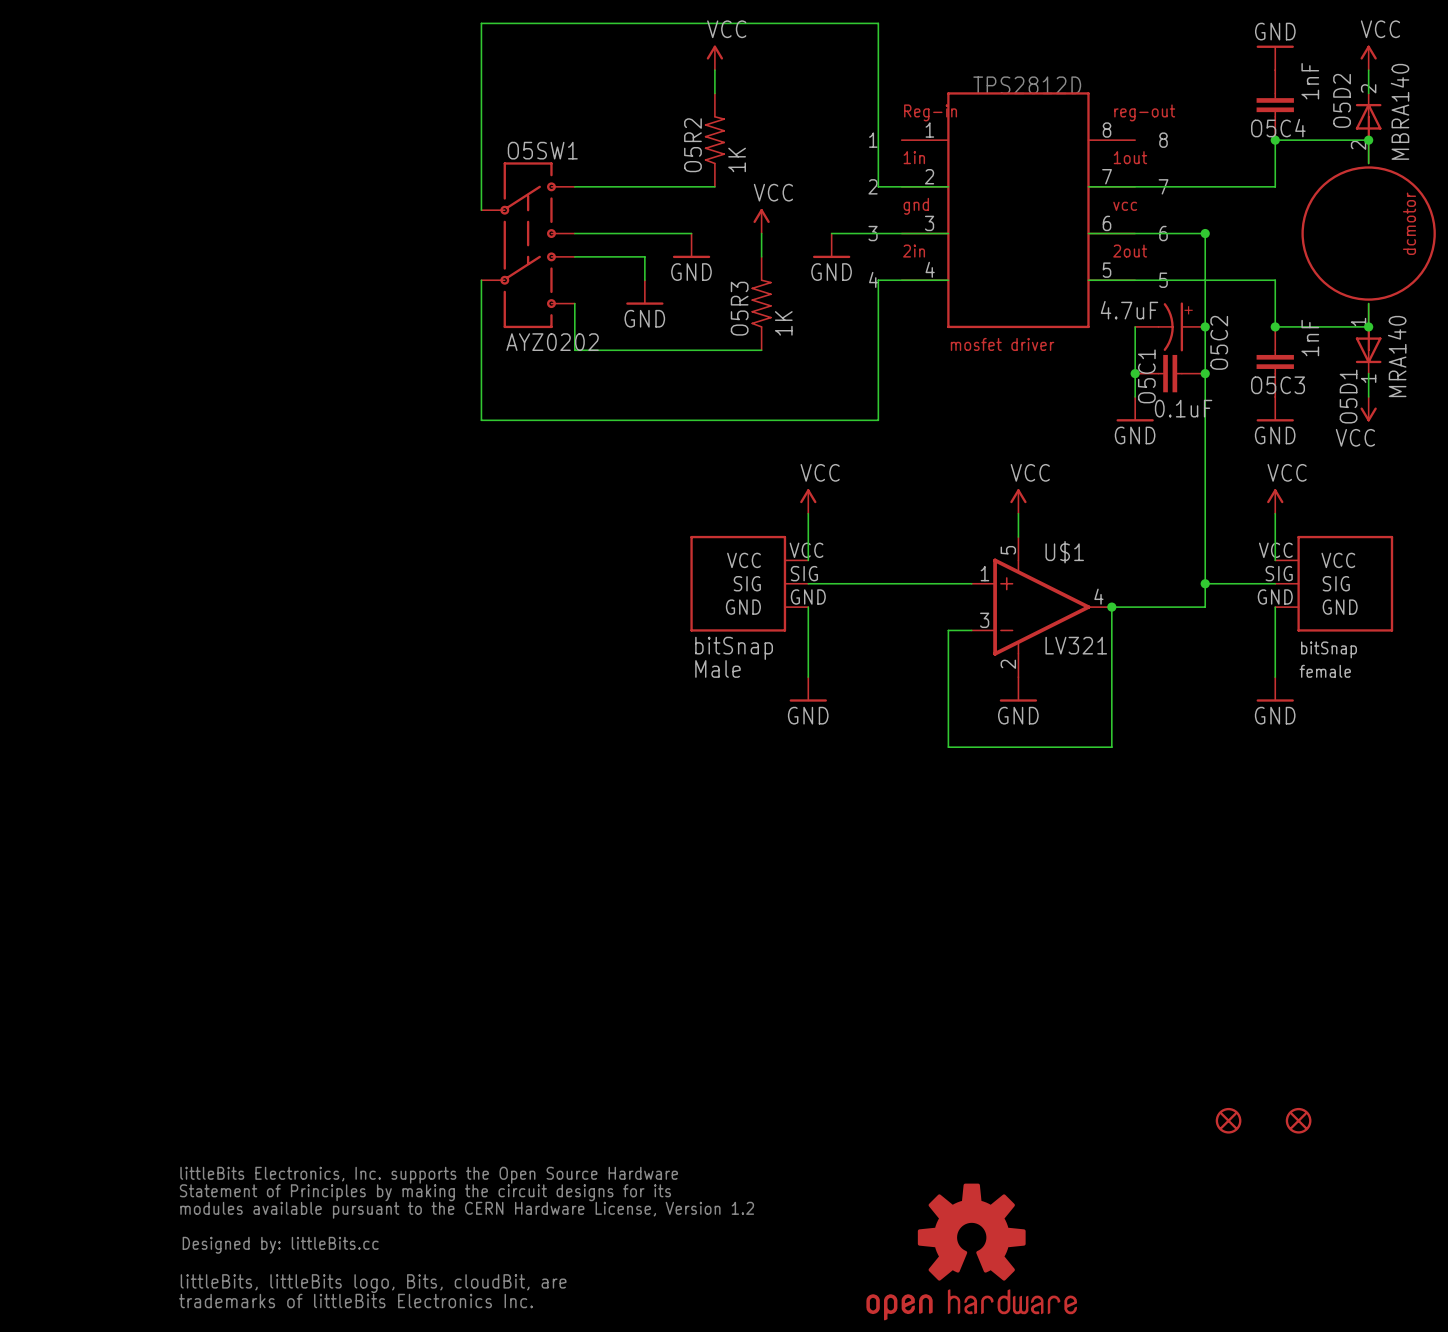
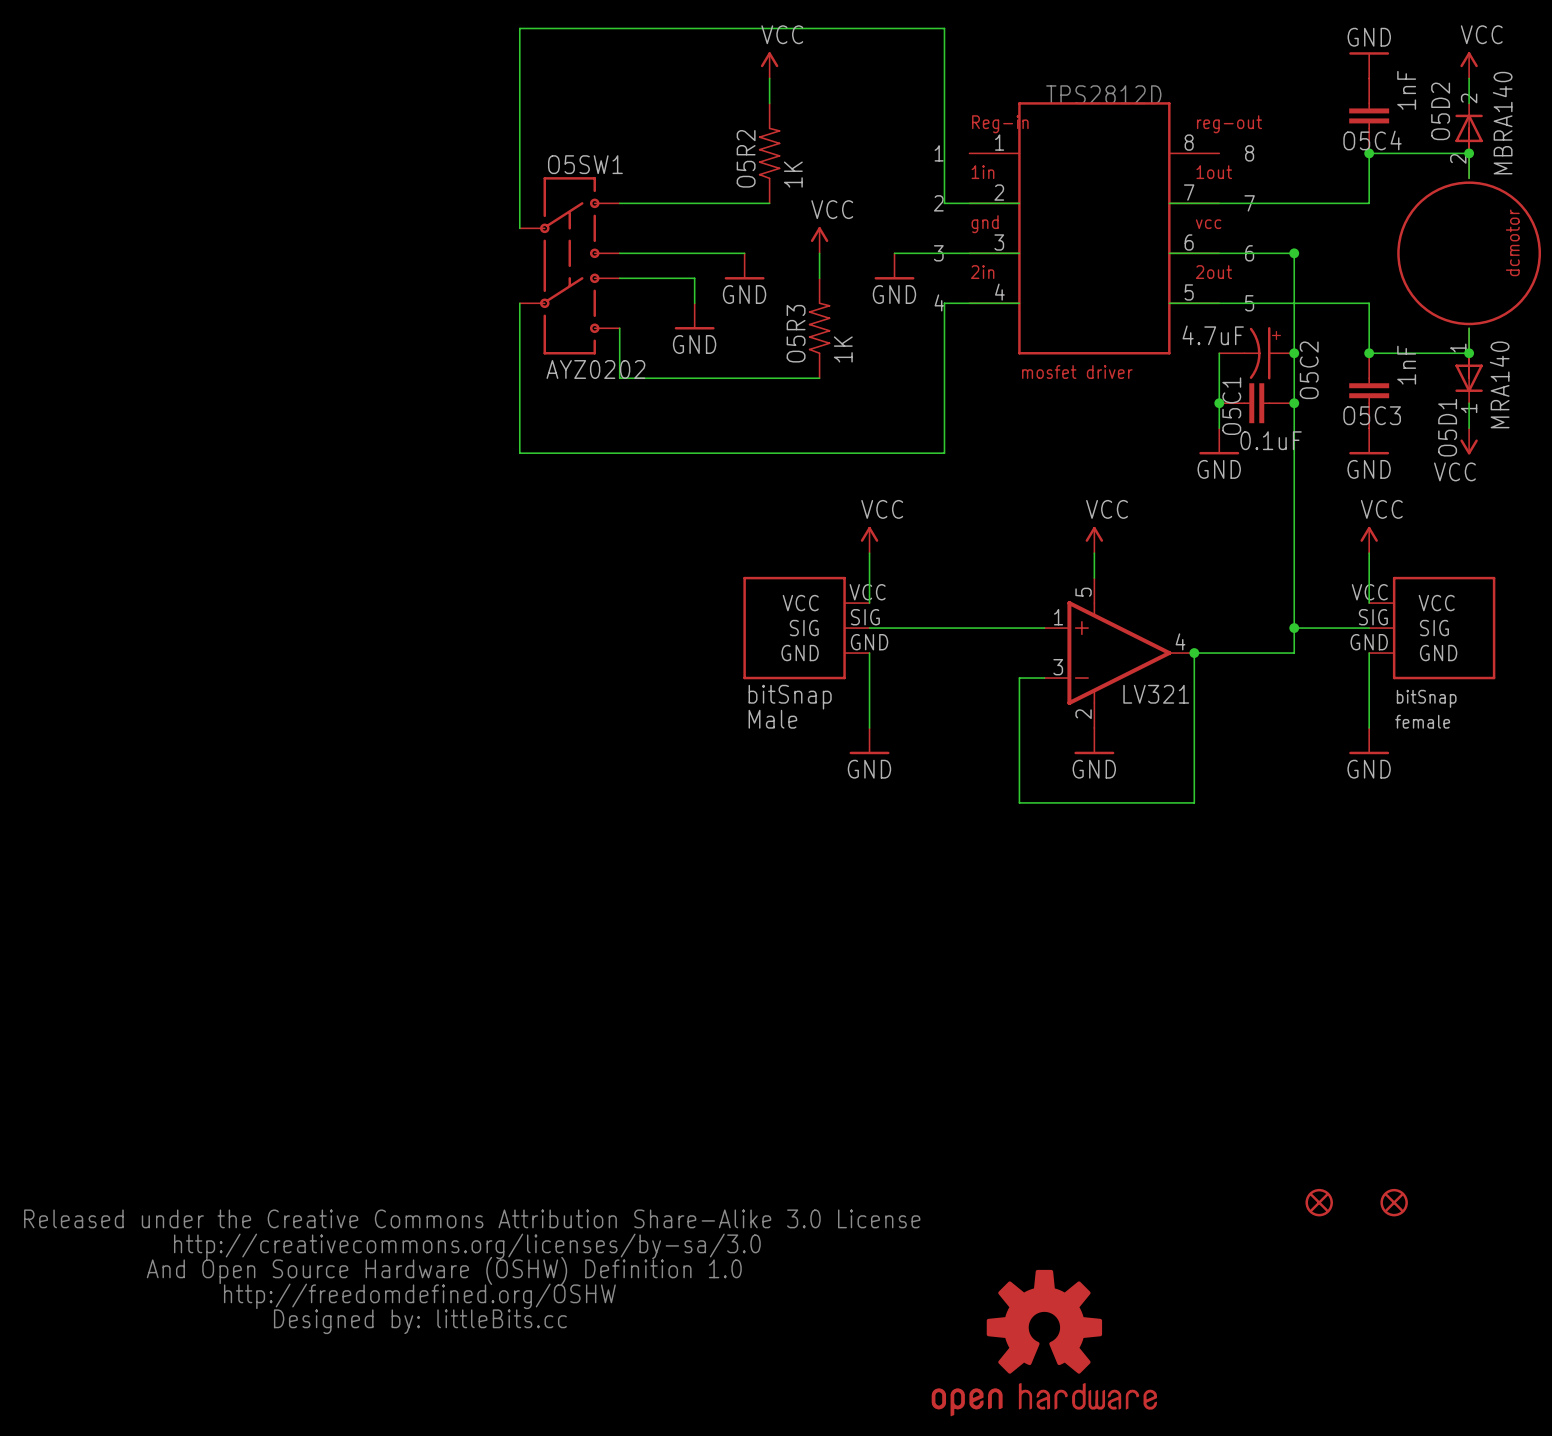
U$1 name: U$1 (1064, 552) -> none
part: none -> (472, 1271)
part: (466, 1237) -> none

